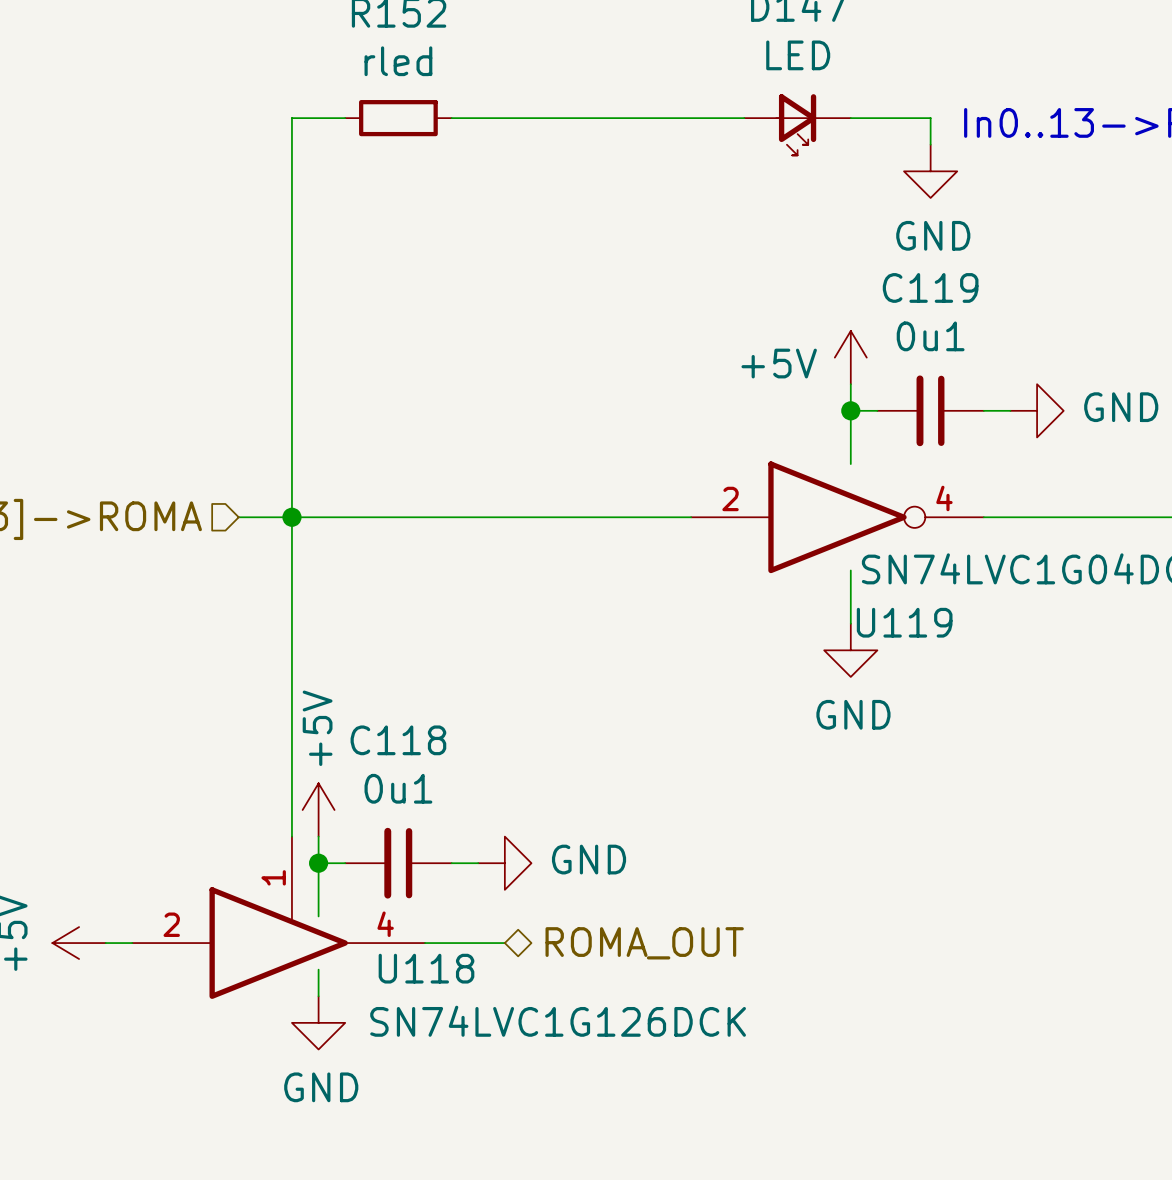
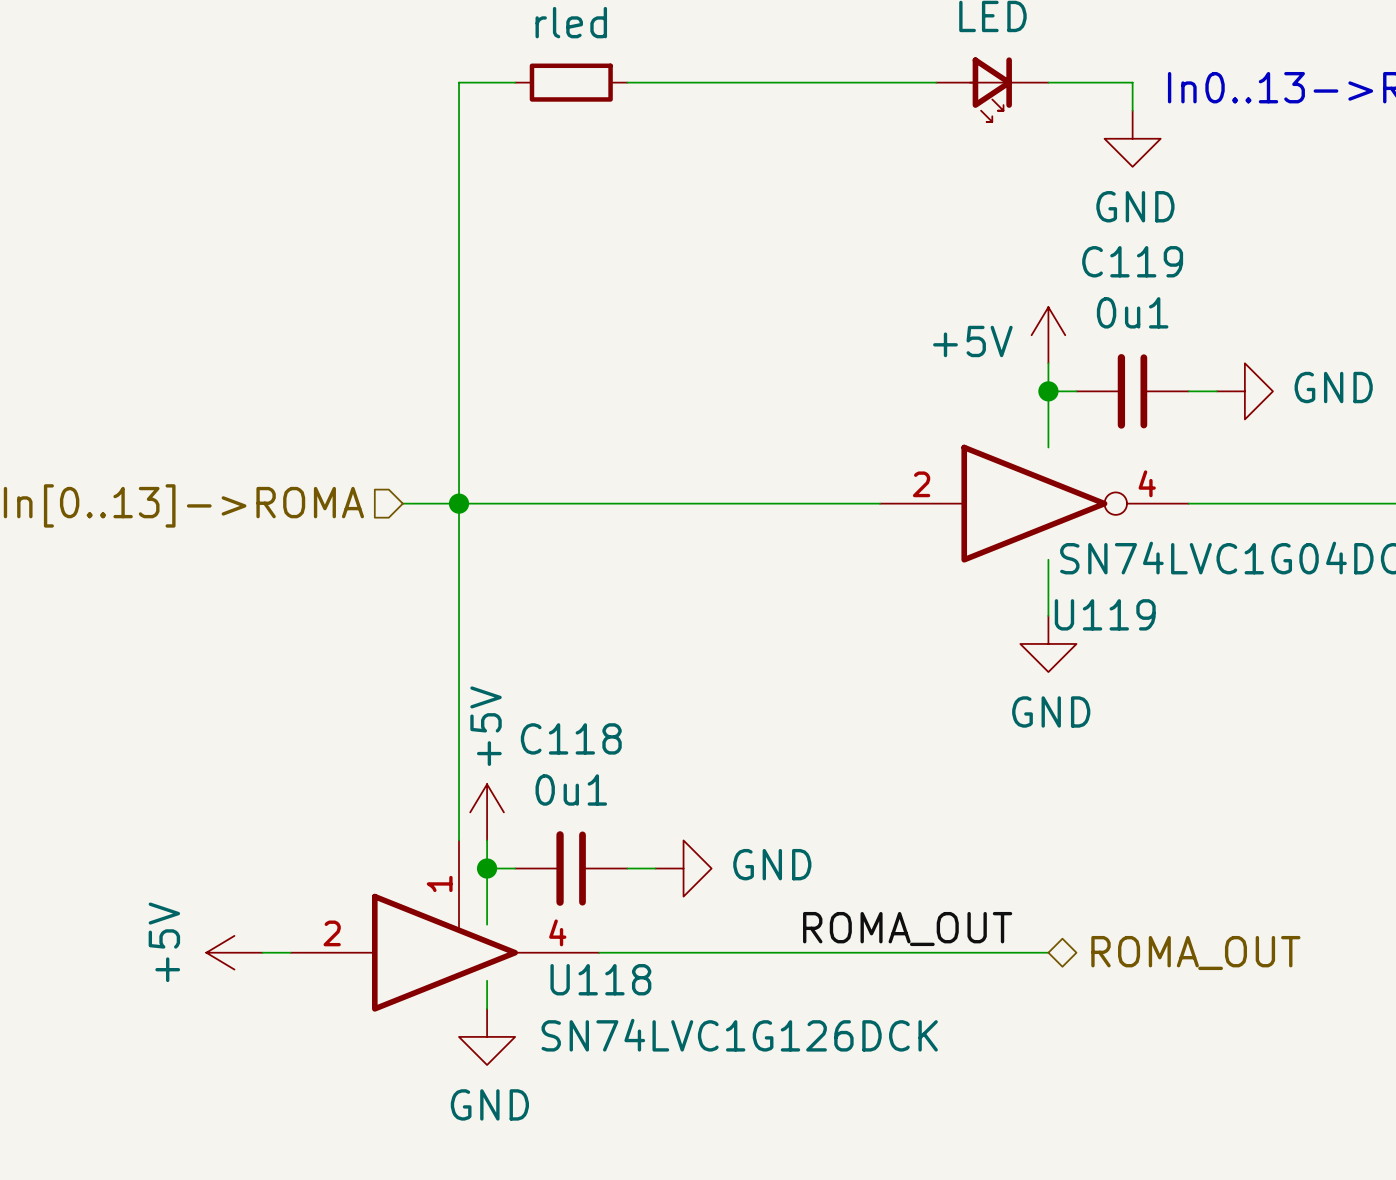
label: none -> ROMA_OUT (907, 929)
wire: none -> (683, 952) (1048, 952)
hierarchical label position: ROMA_OUT (644, 943) -> ROMA_OUT (1195, 953)

